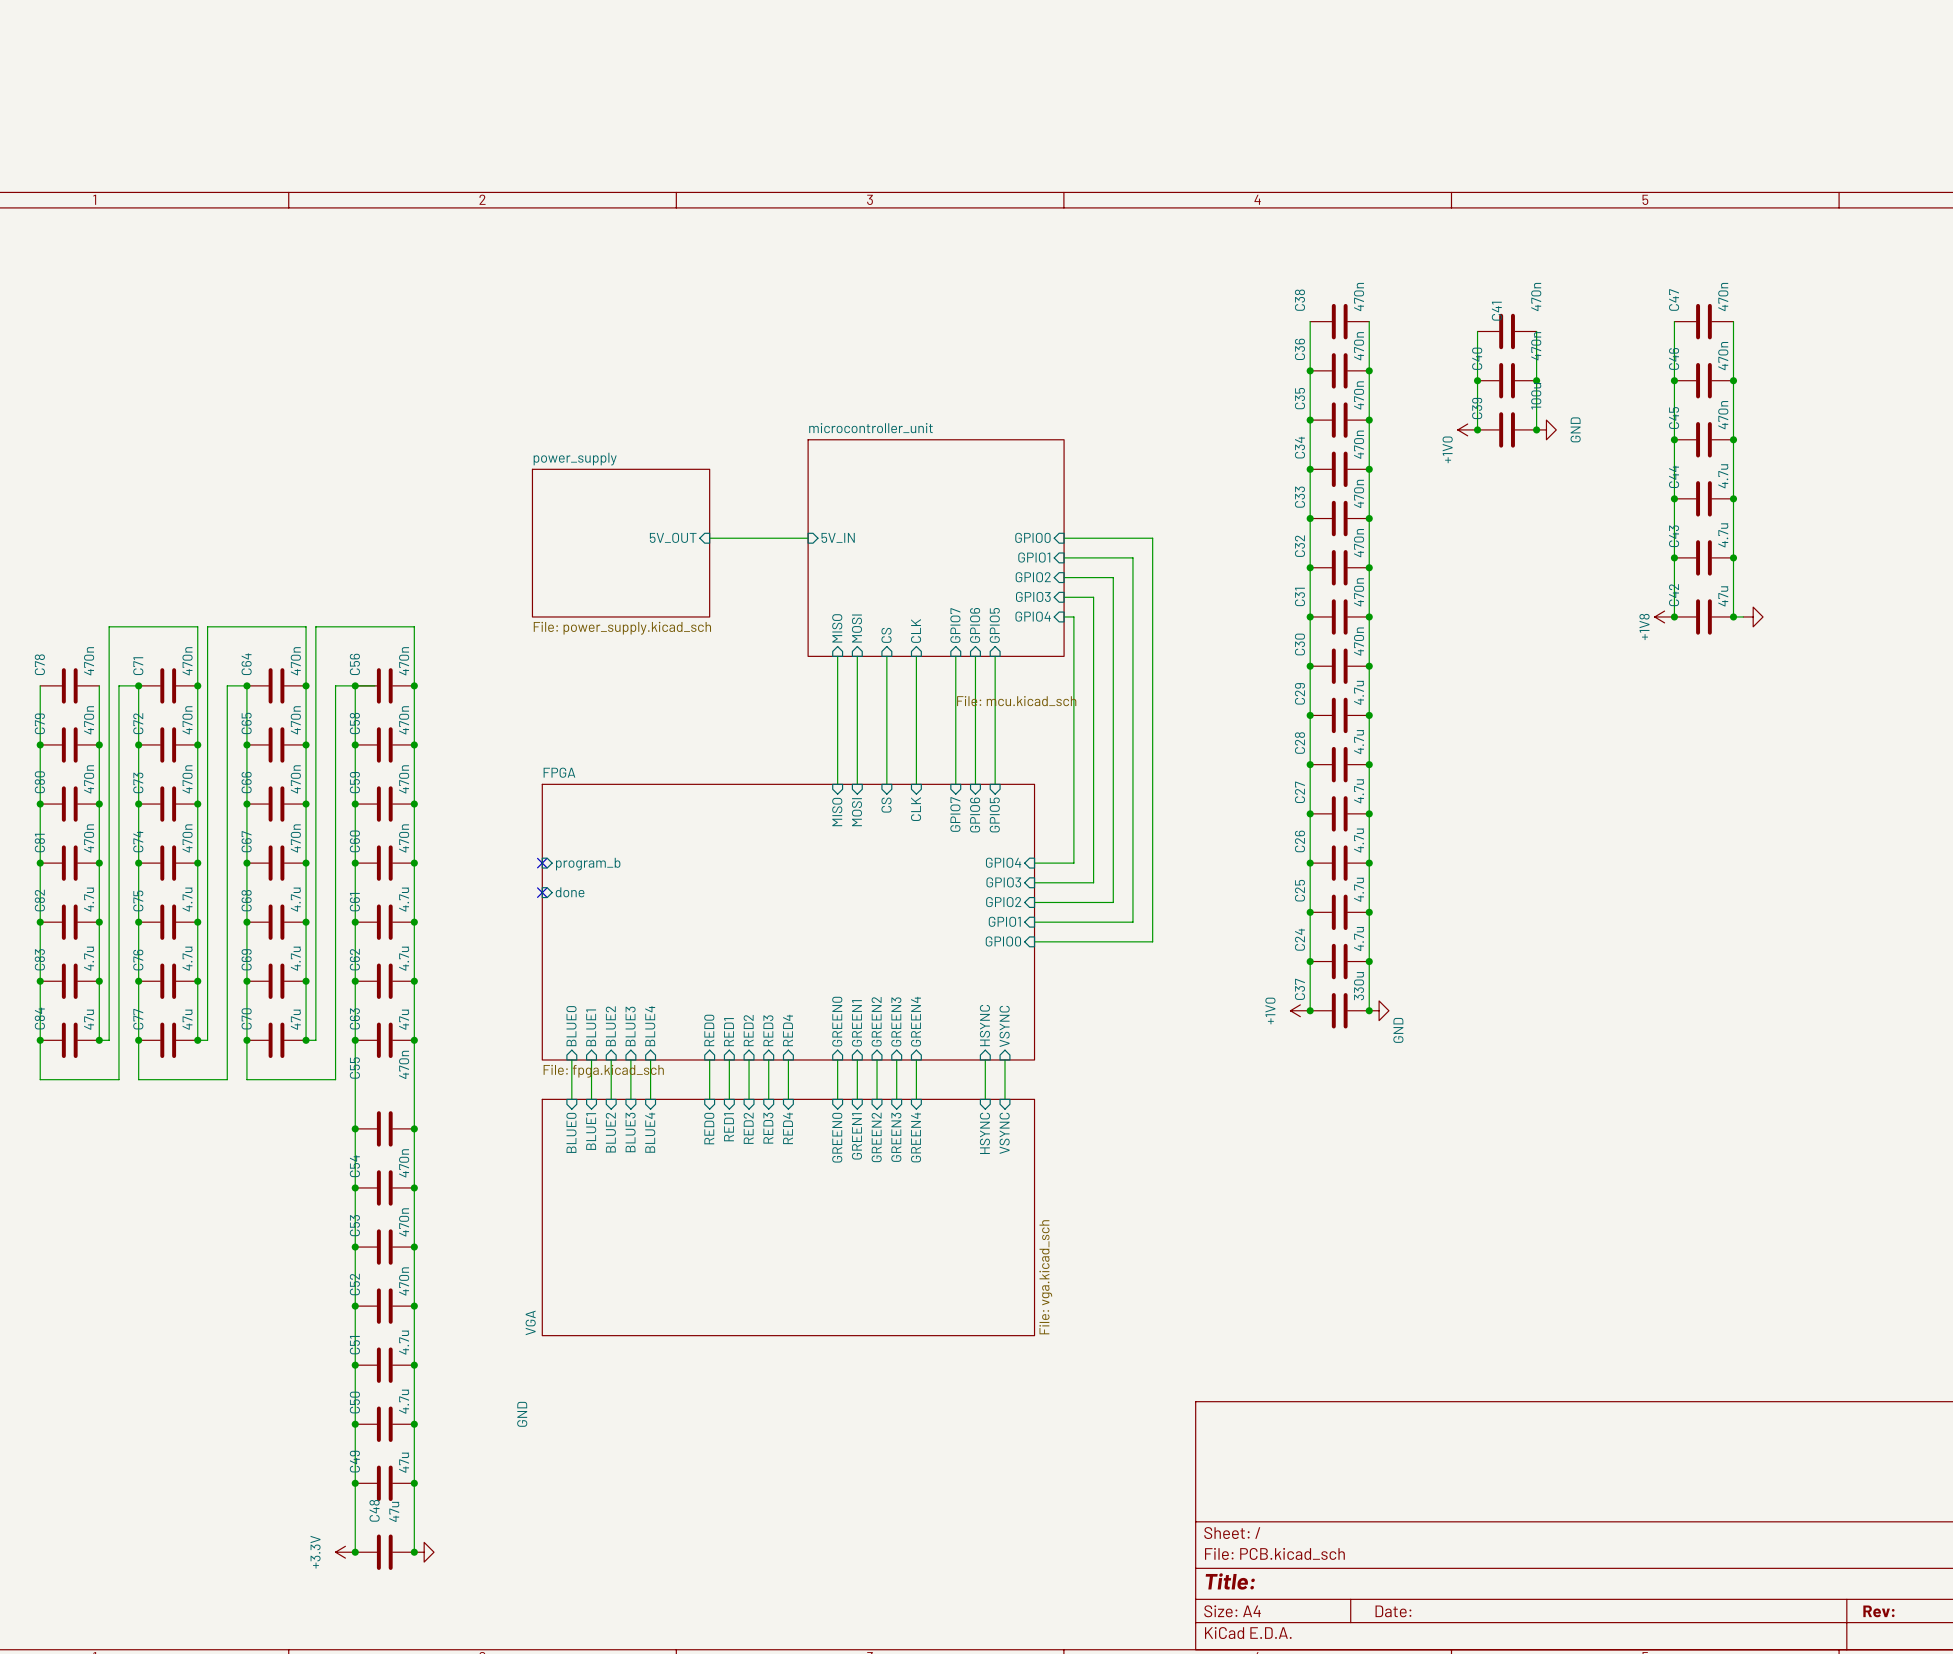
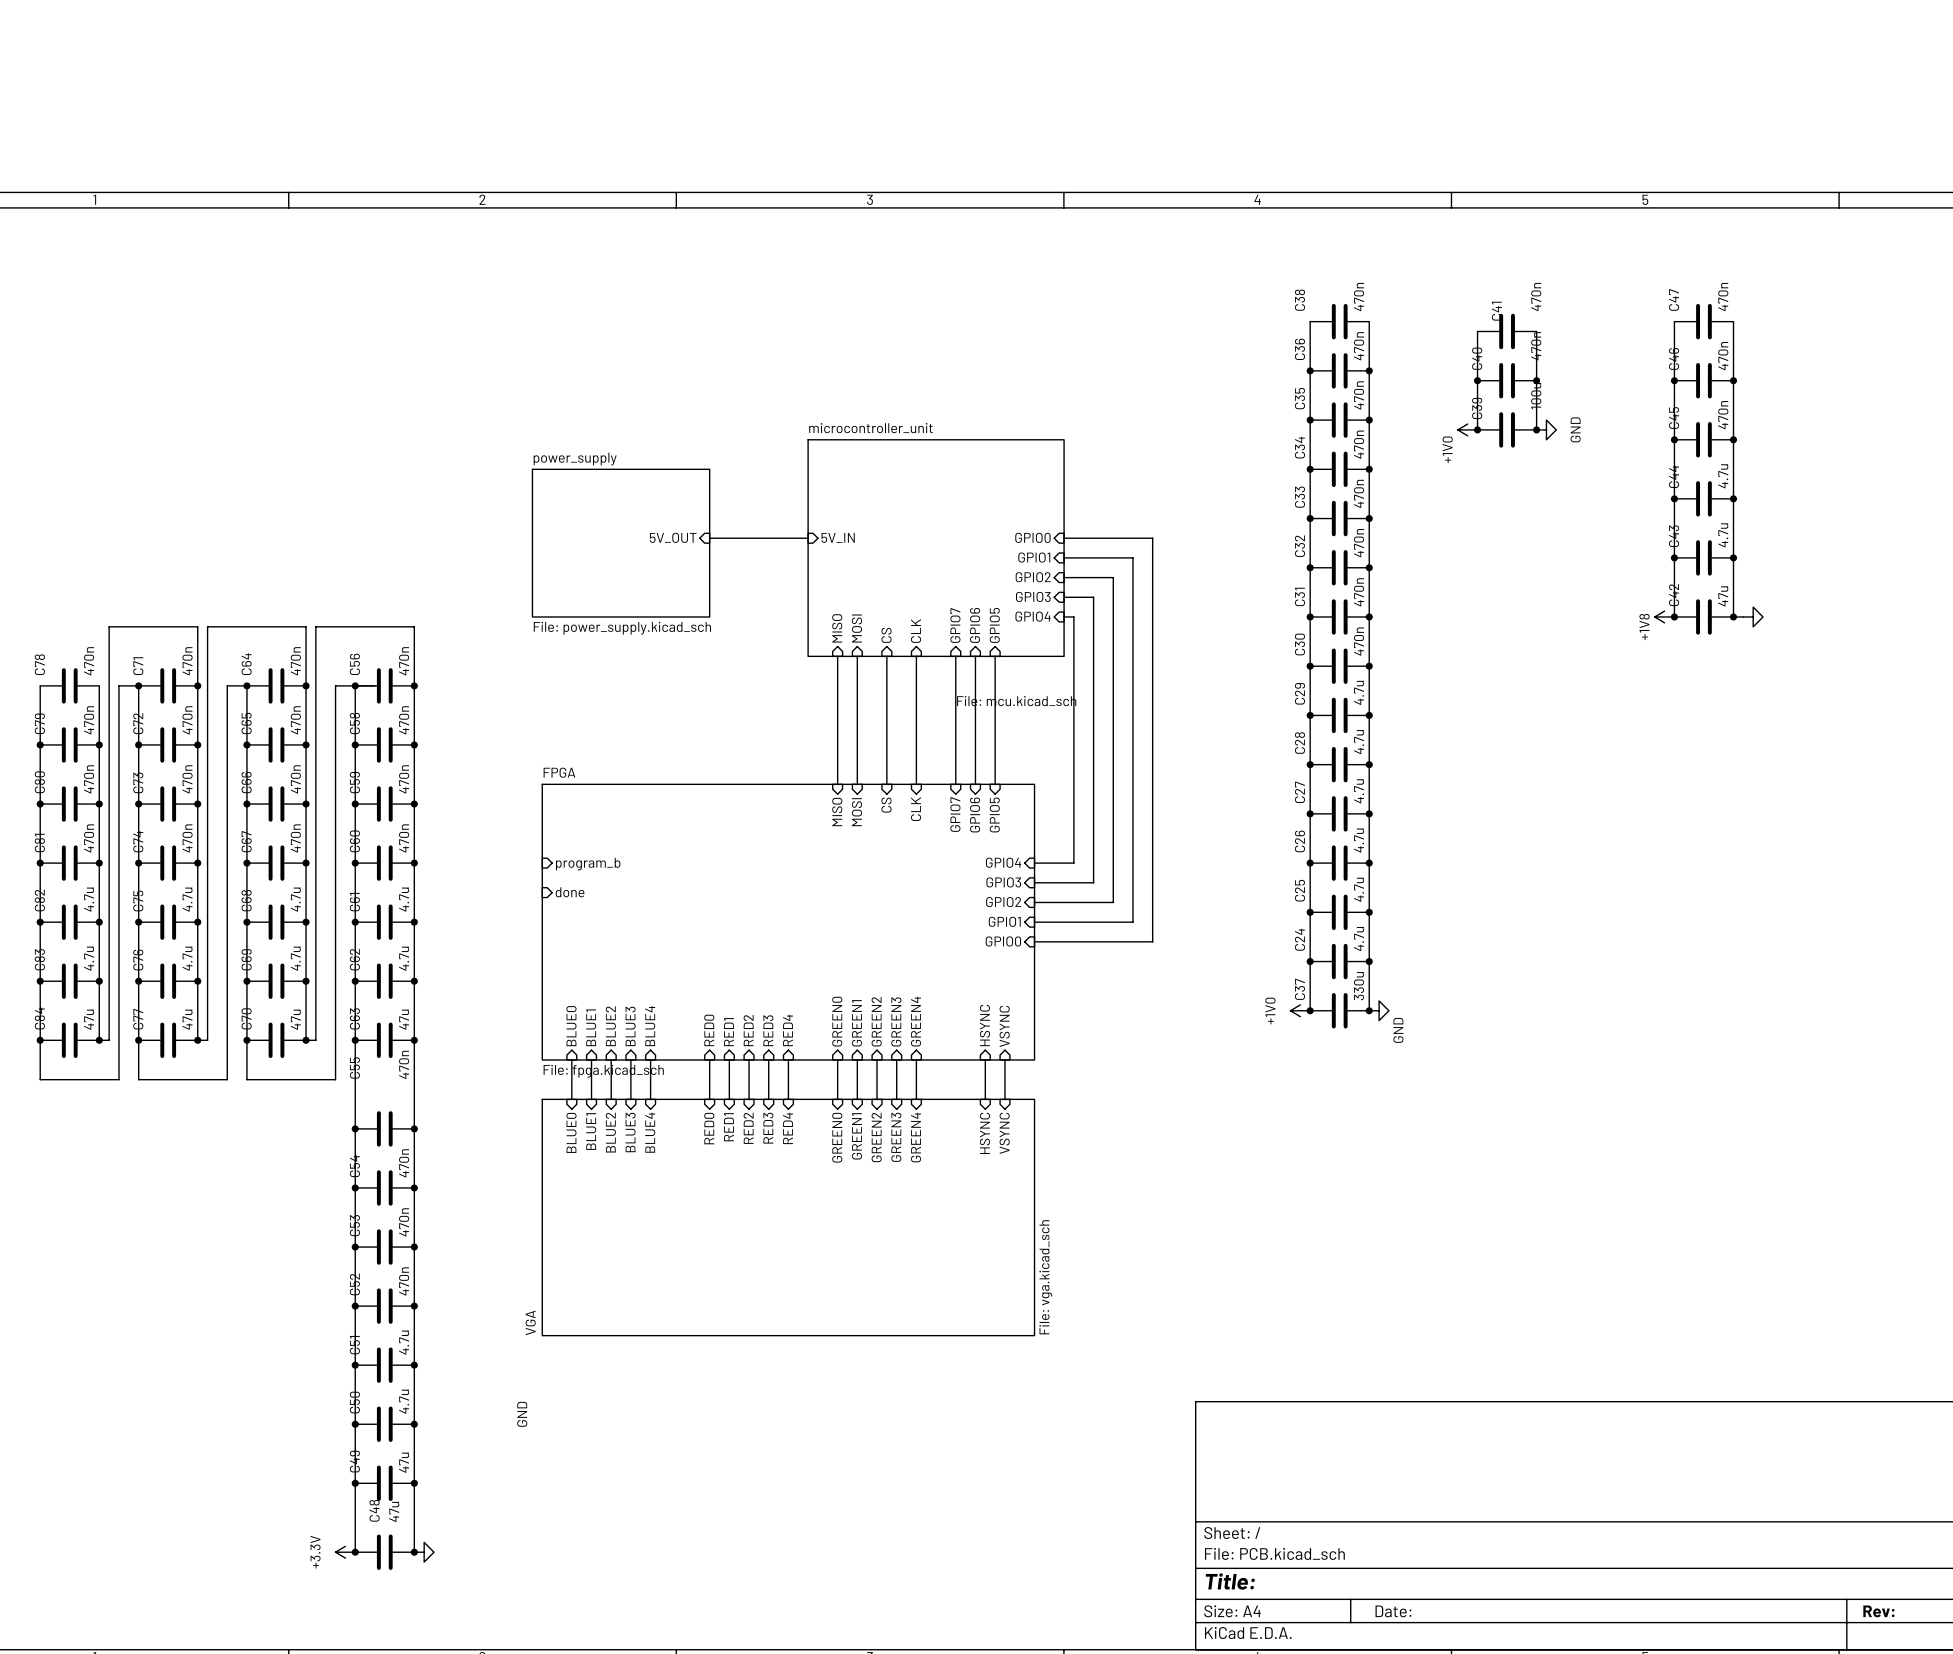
no-connect mark: (542, 863) -> none
no-connect mark: (542, 892) -> none

